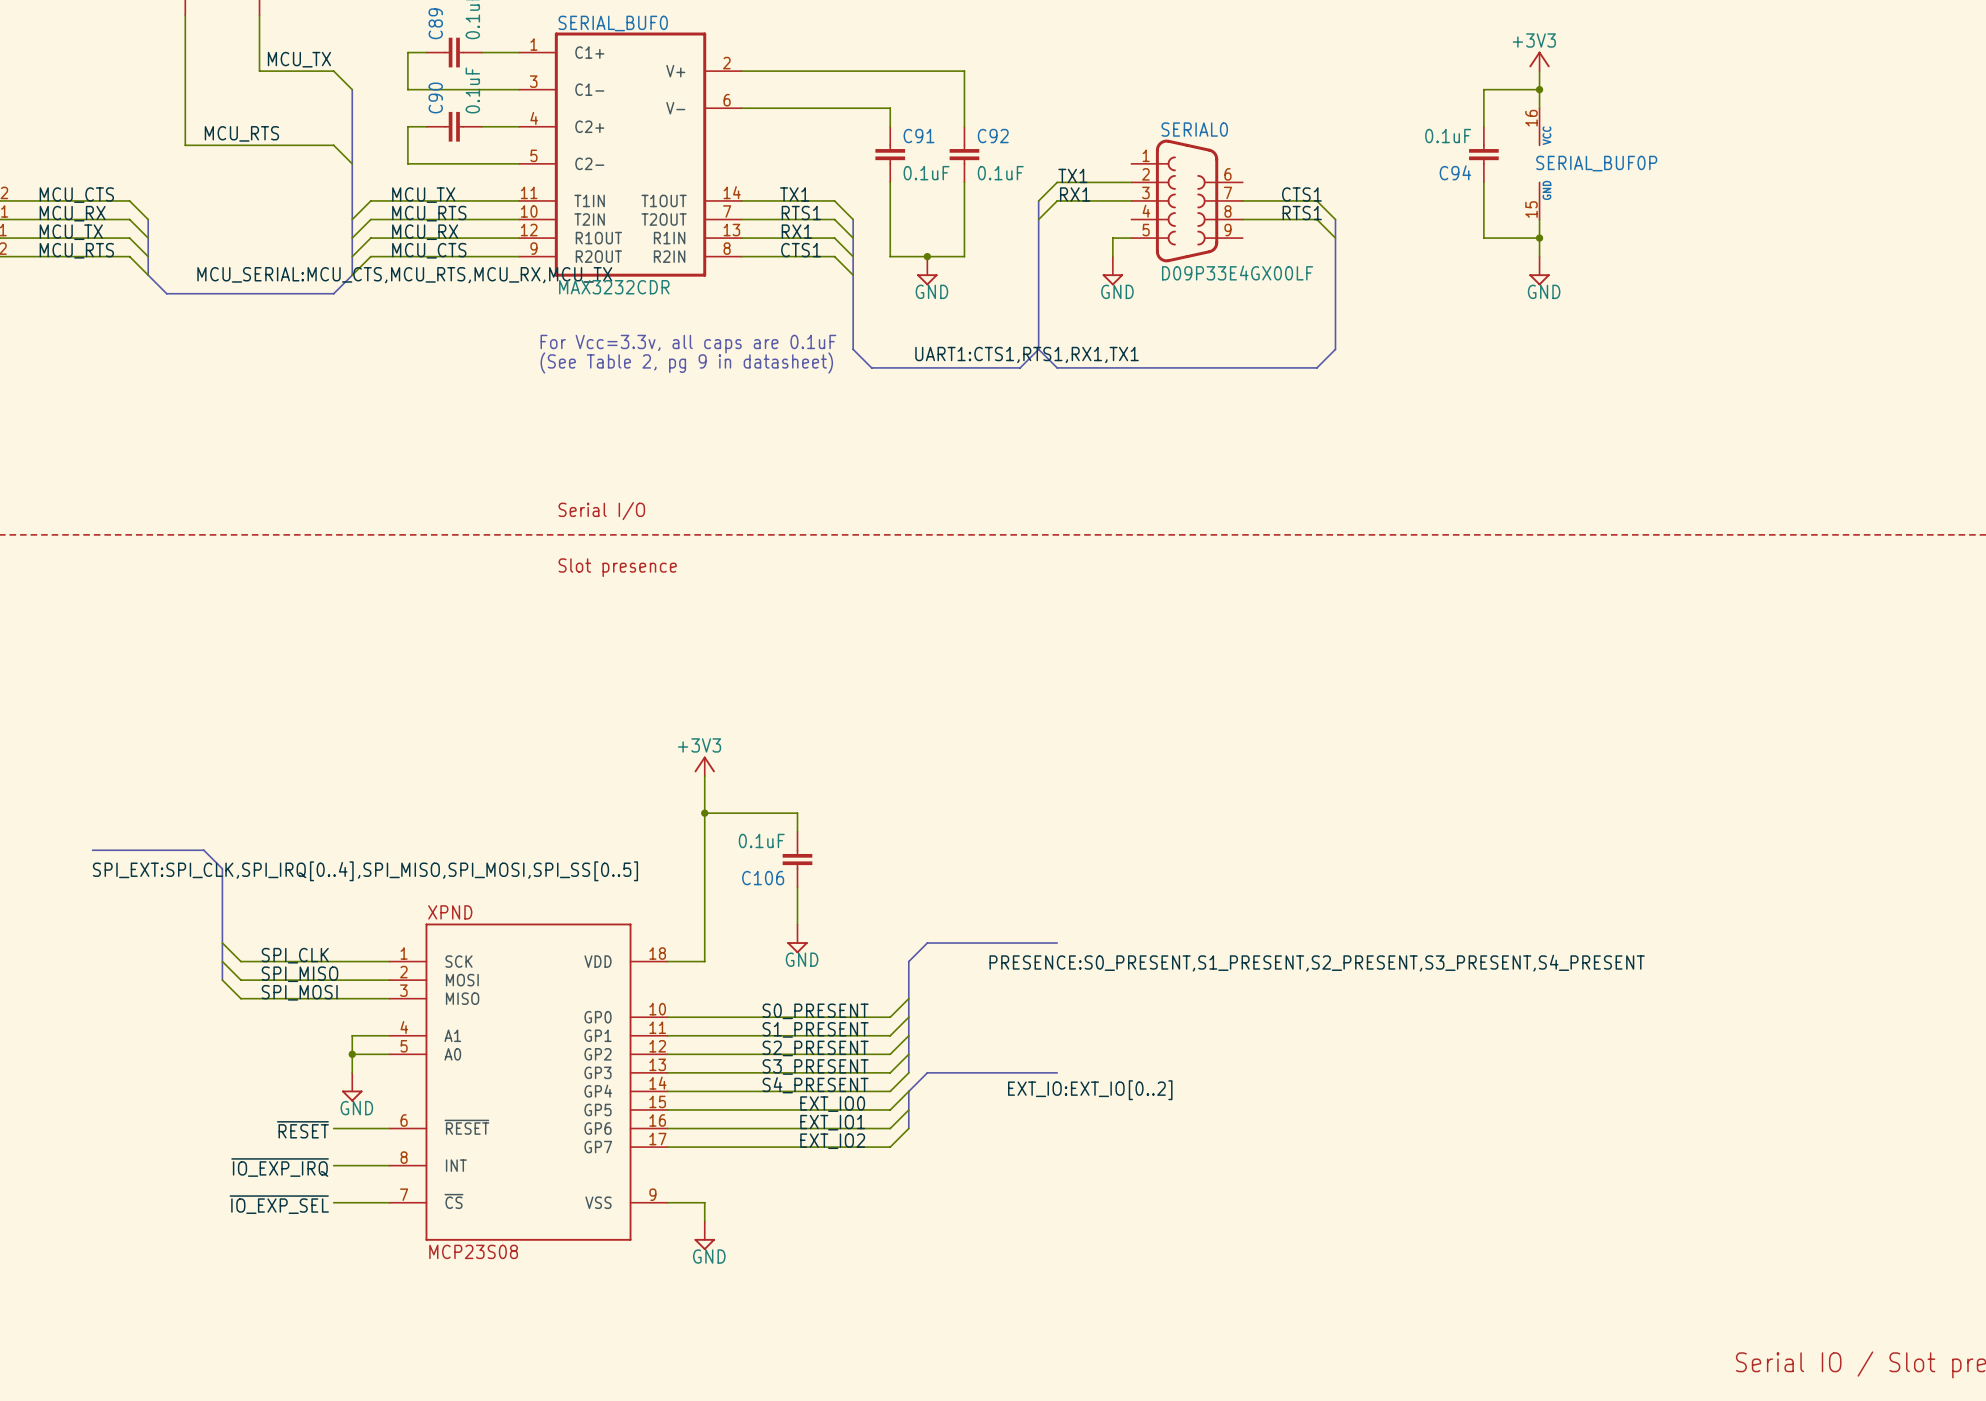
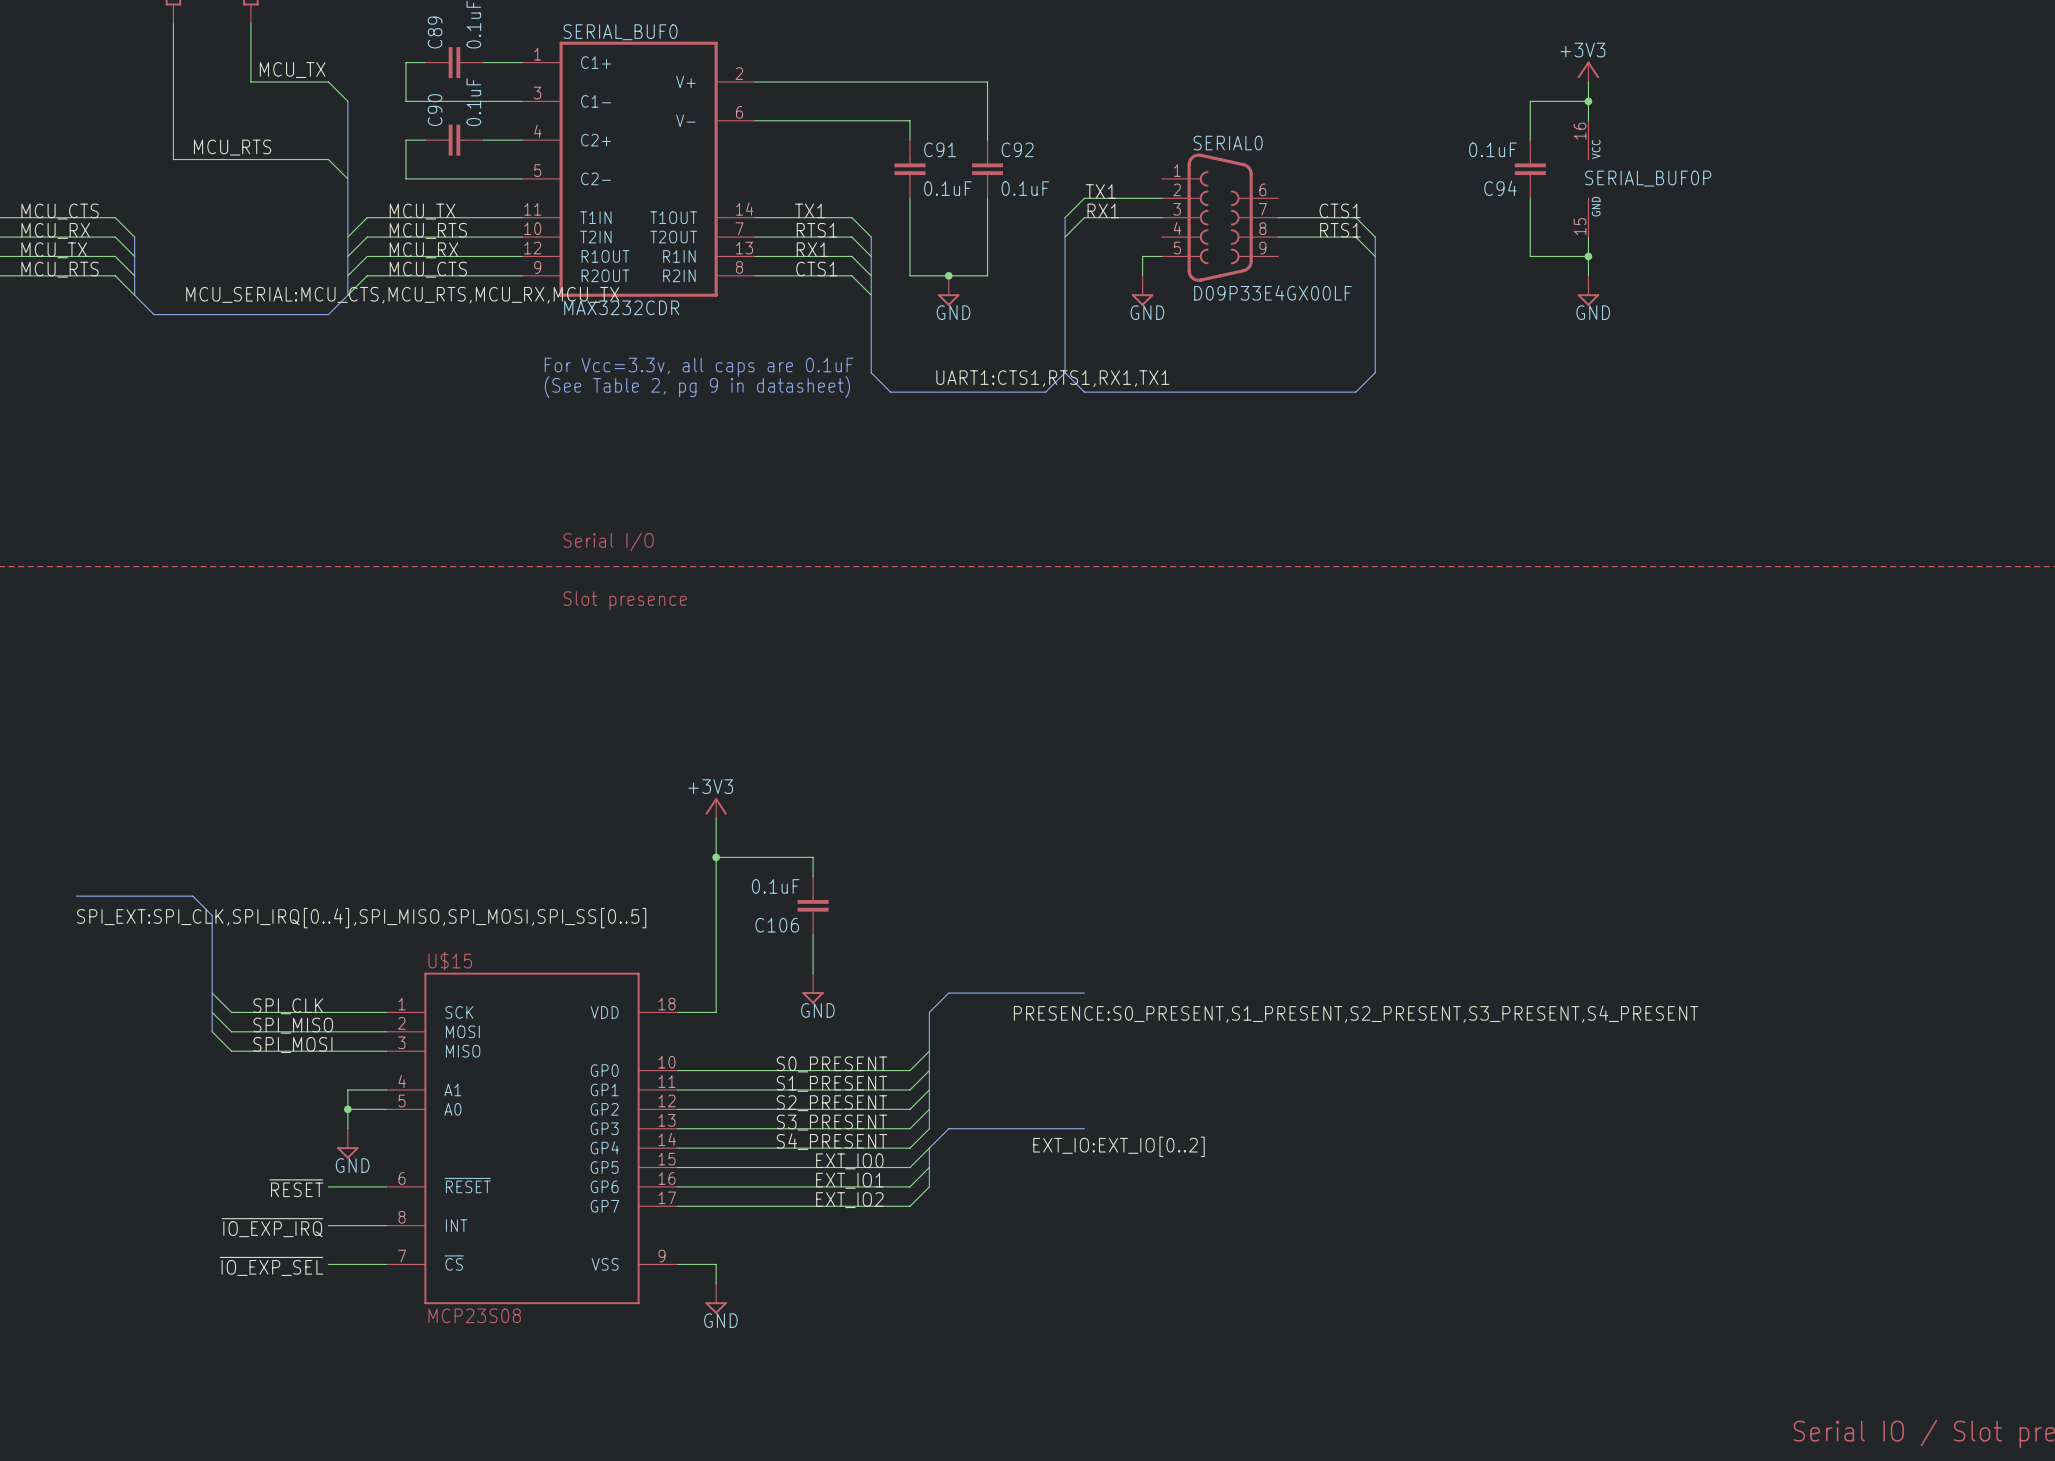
XPND name: XPND (450, 912) -> U$15 (450, 961)

